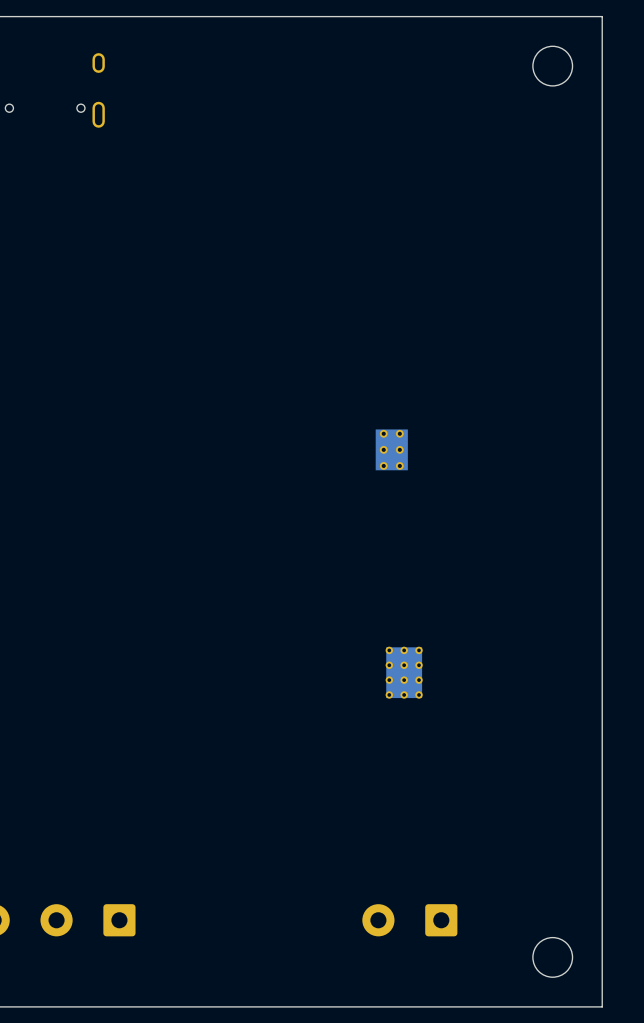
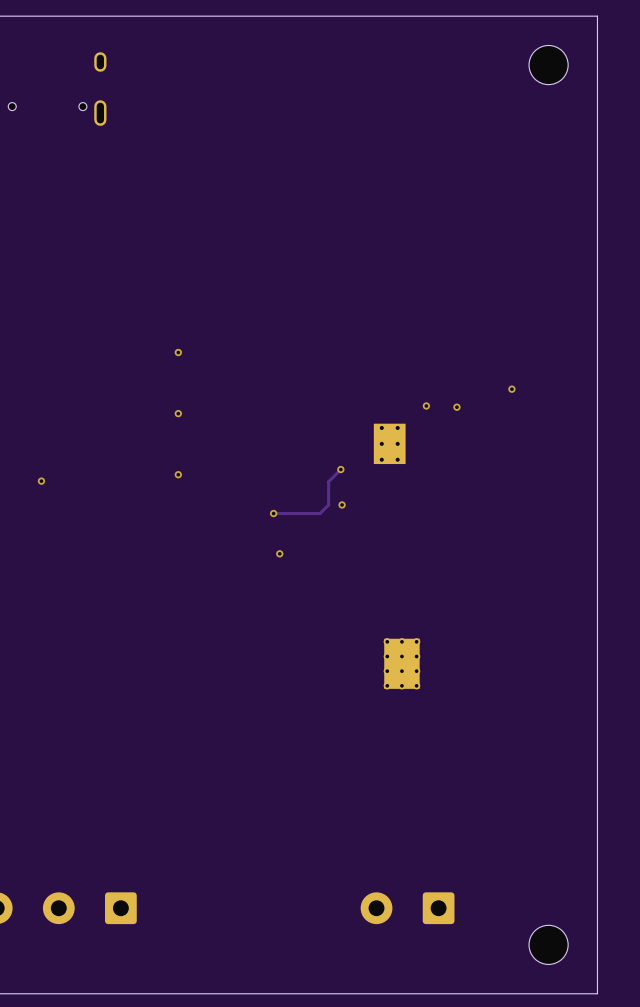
via: none -> (178, 352)
via: none -> (511, 389)
via: none -> (426, 405)
via: none -> (456, 407)
via: none -> (178, 413)
track: none -> (340, 469) (328, 481) (328, 504) (320, 513) (273, 513)
via: none -> (340, 469)
via: none -> (178, 474)
via: none -> (41, 481)
via: none -> (342, 504)
via: none -> (273, 513)
via: none -> (279, 553)

